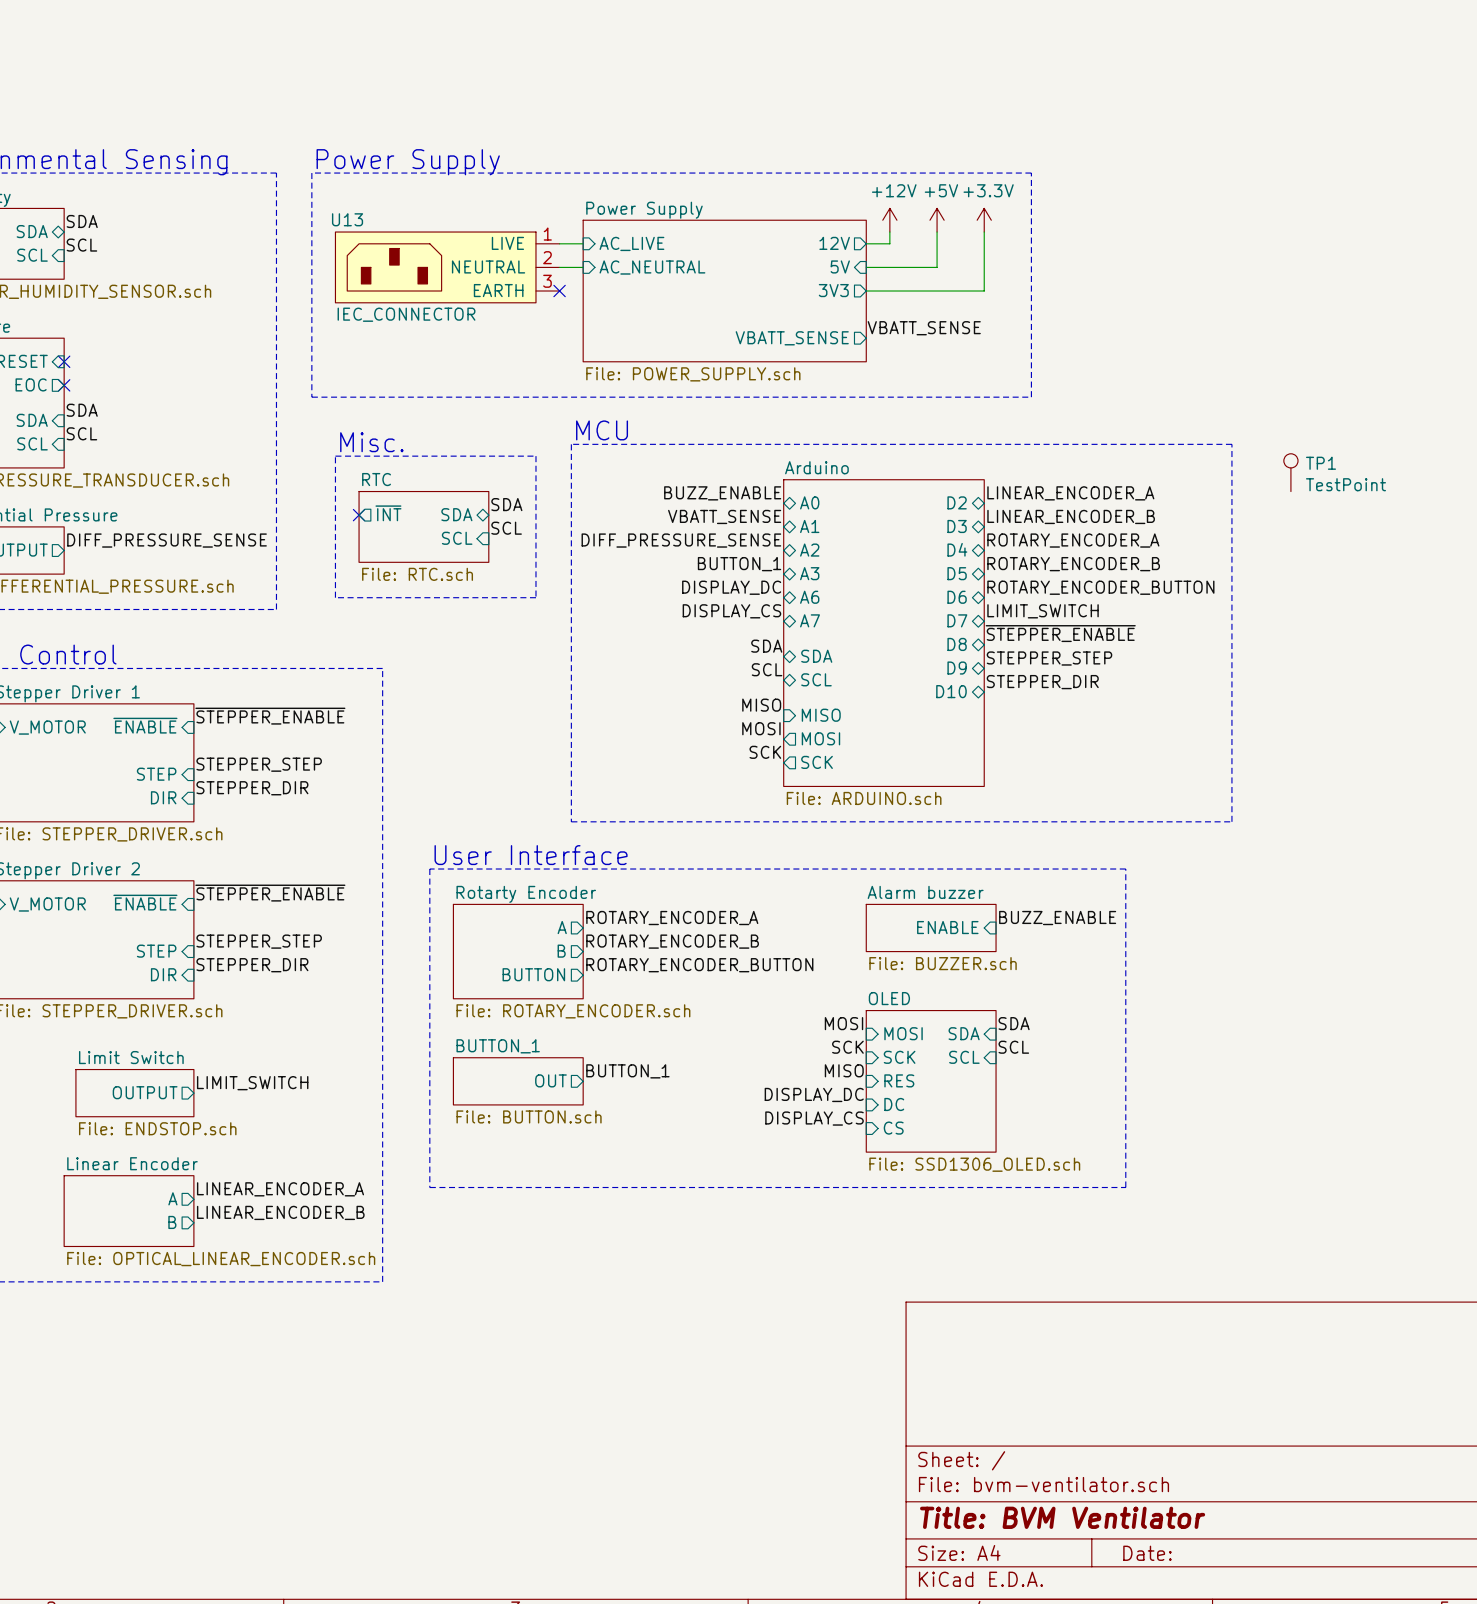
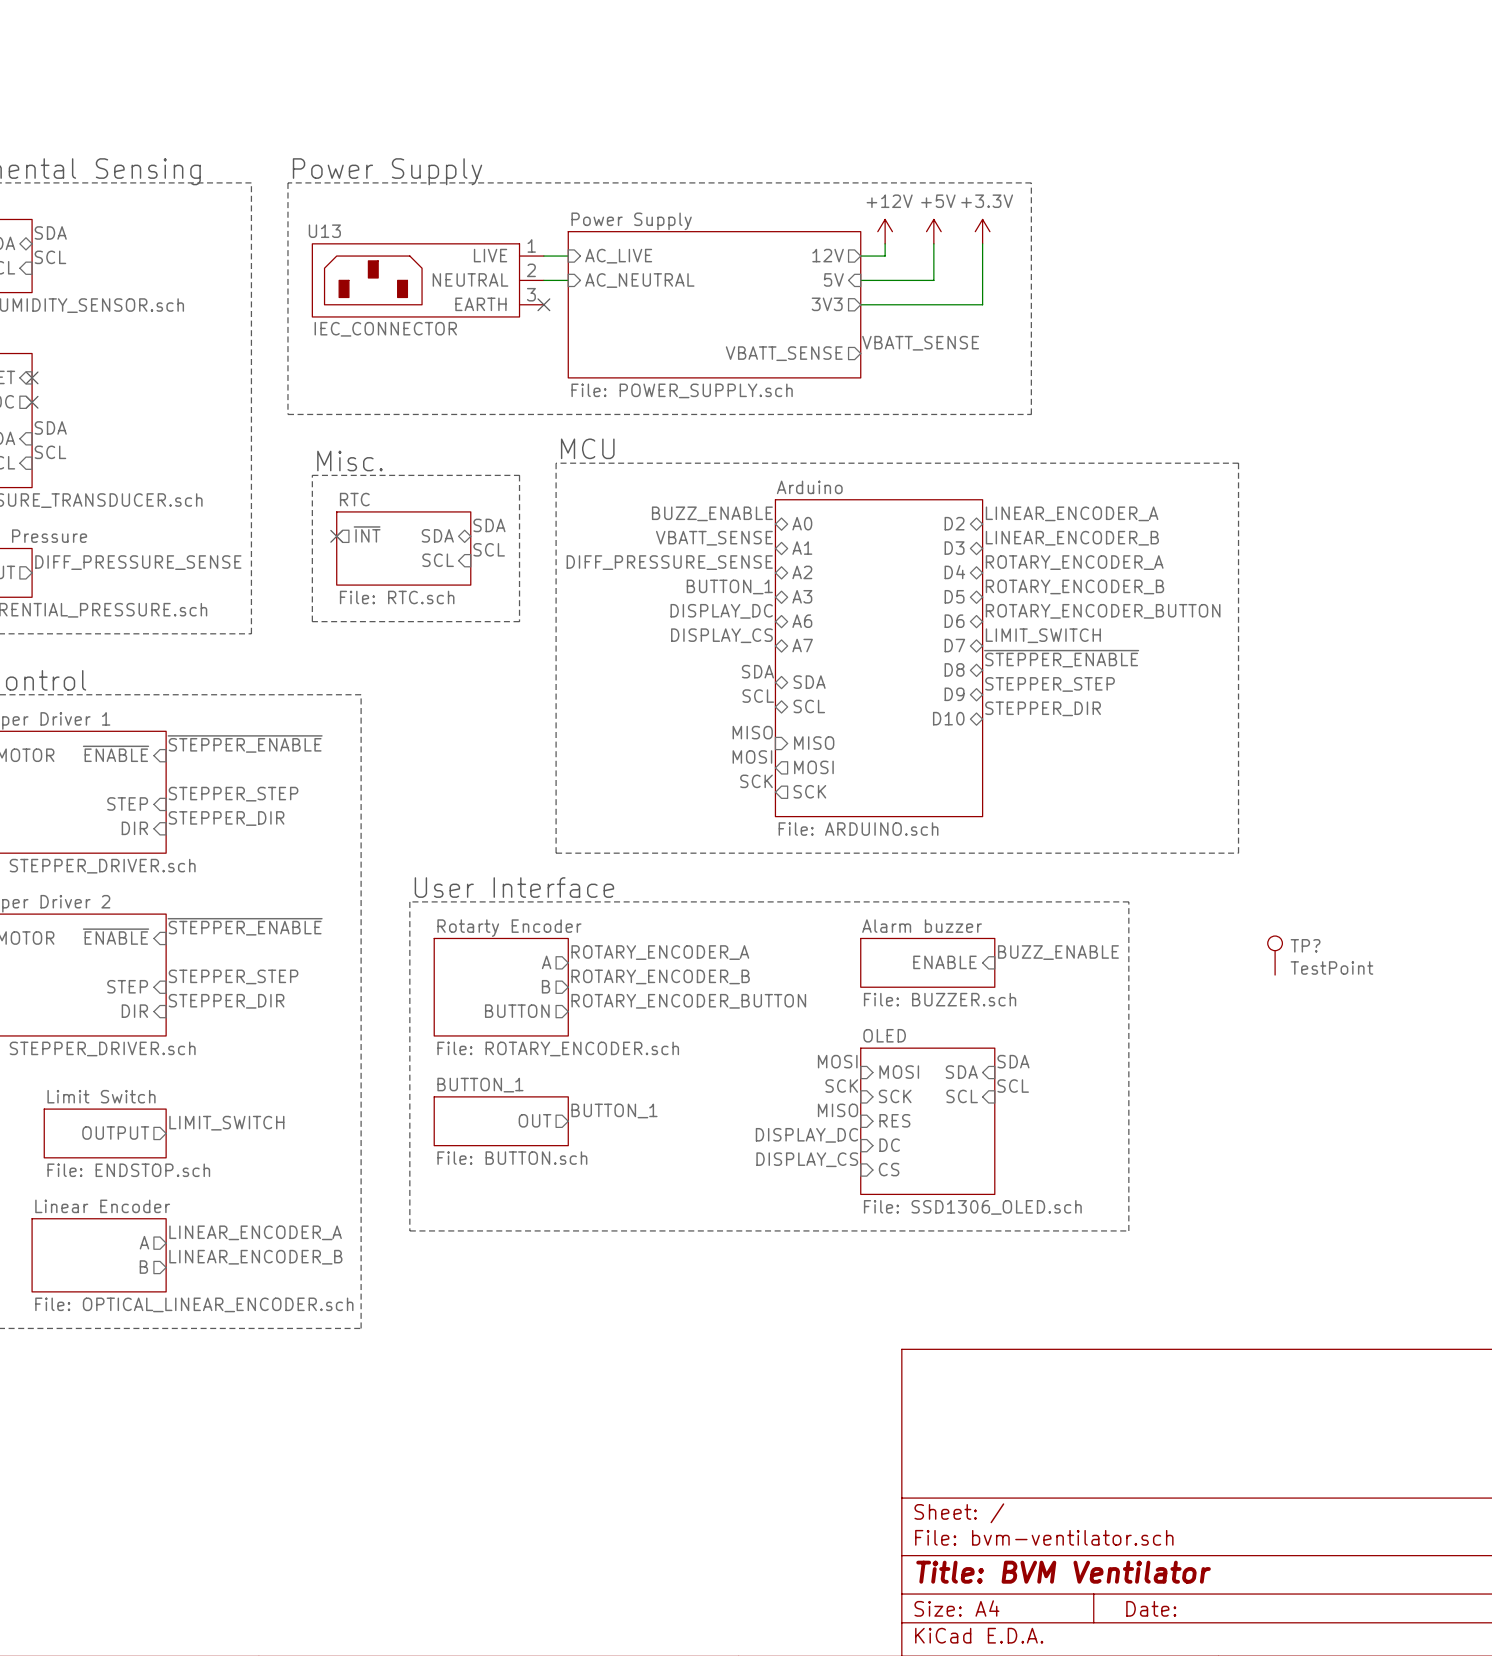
TP1: TestPoint (1290, 472) -> none
TP?: none -> TestPoint (1275, 955)

